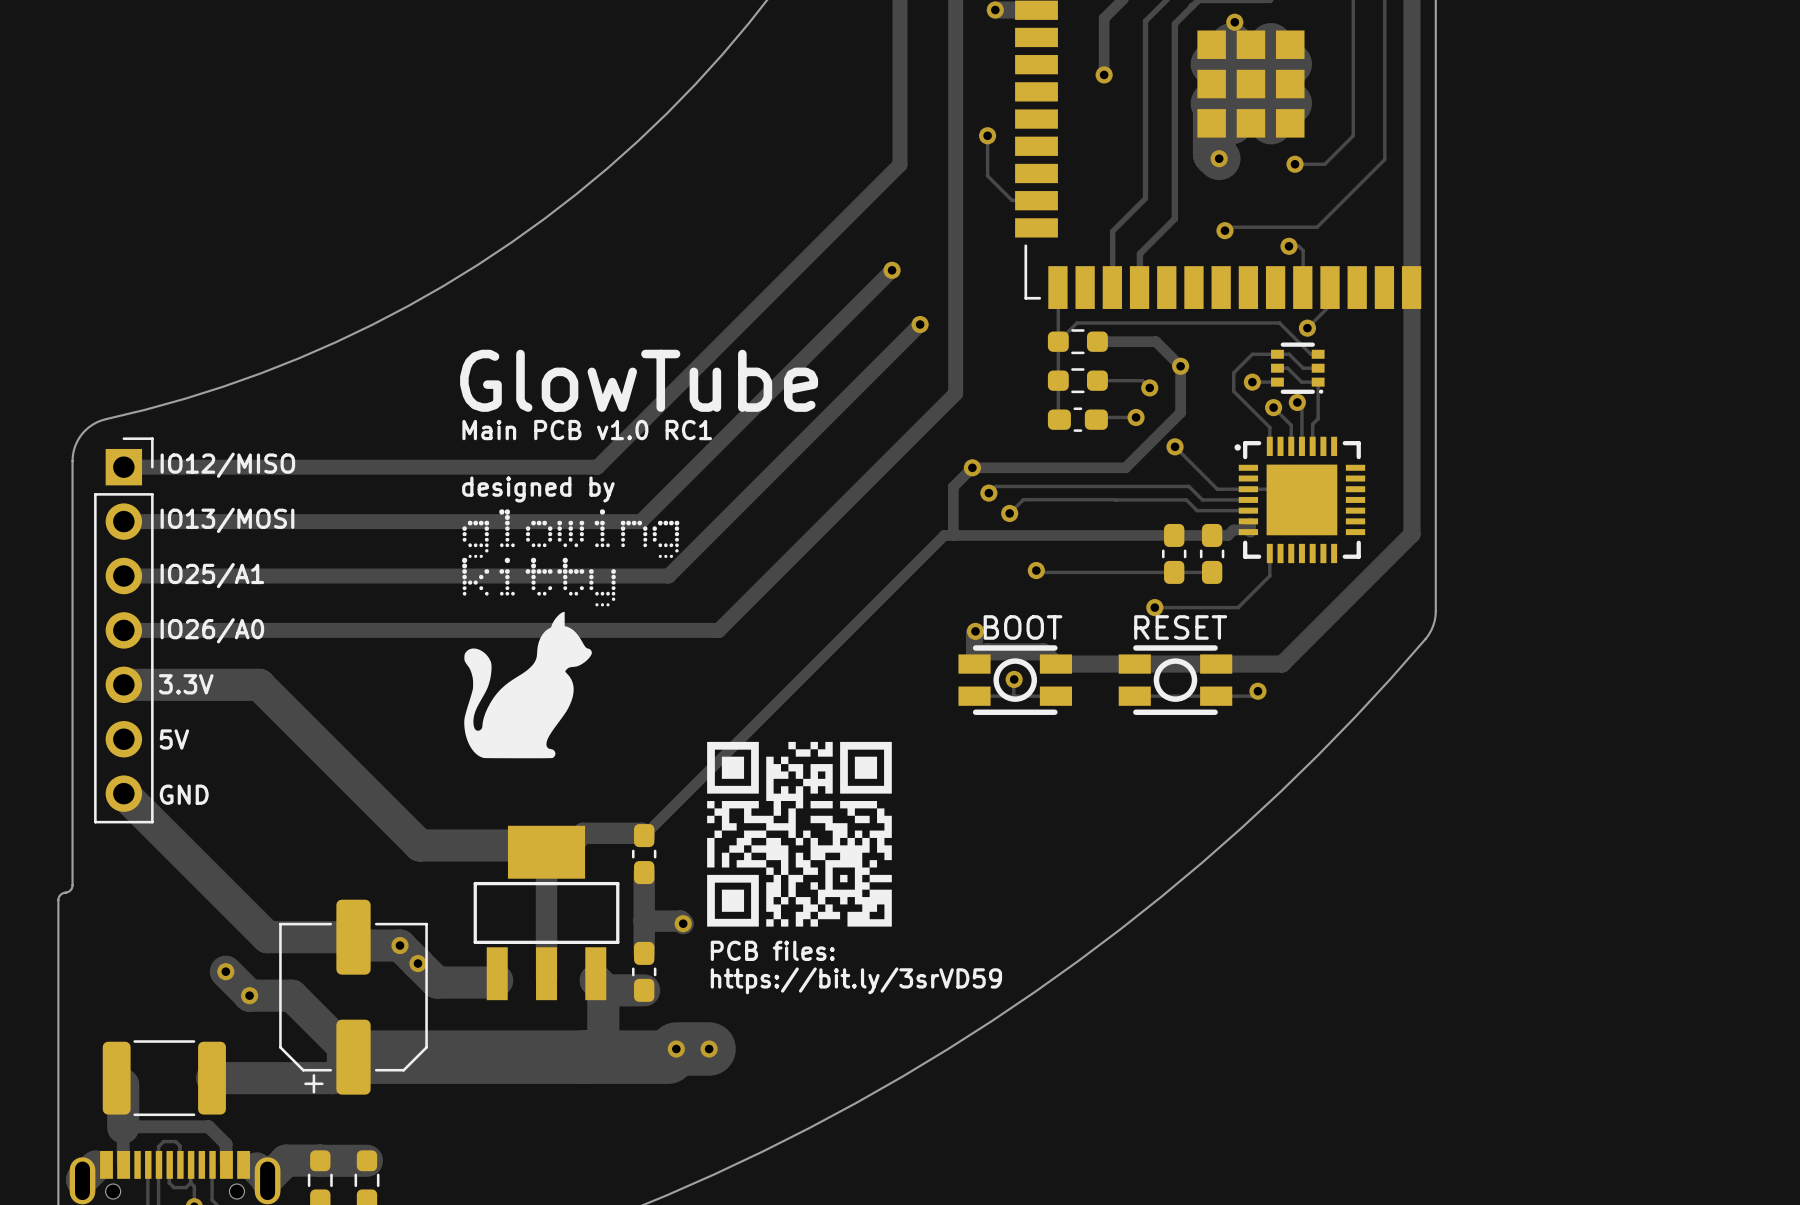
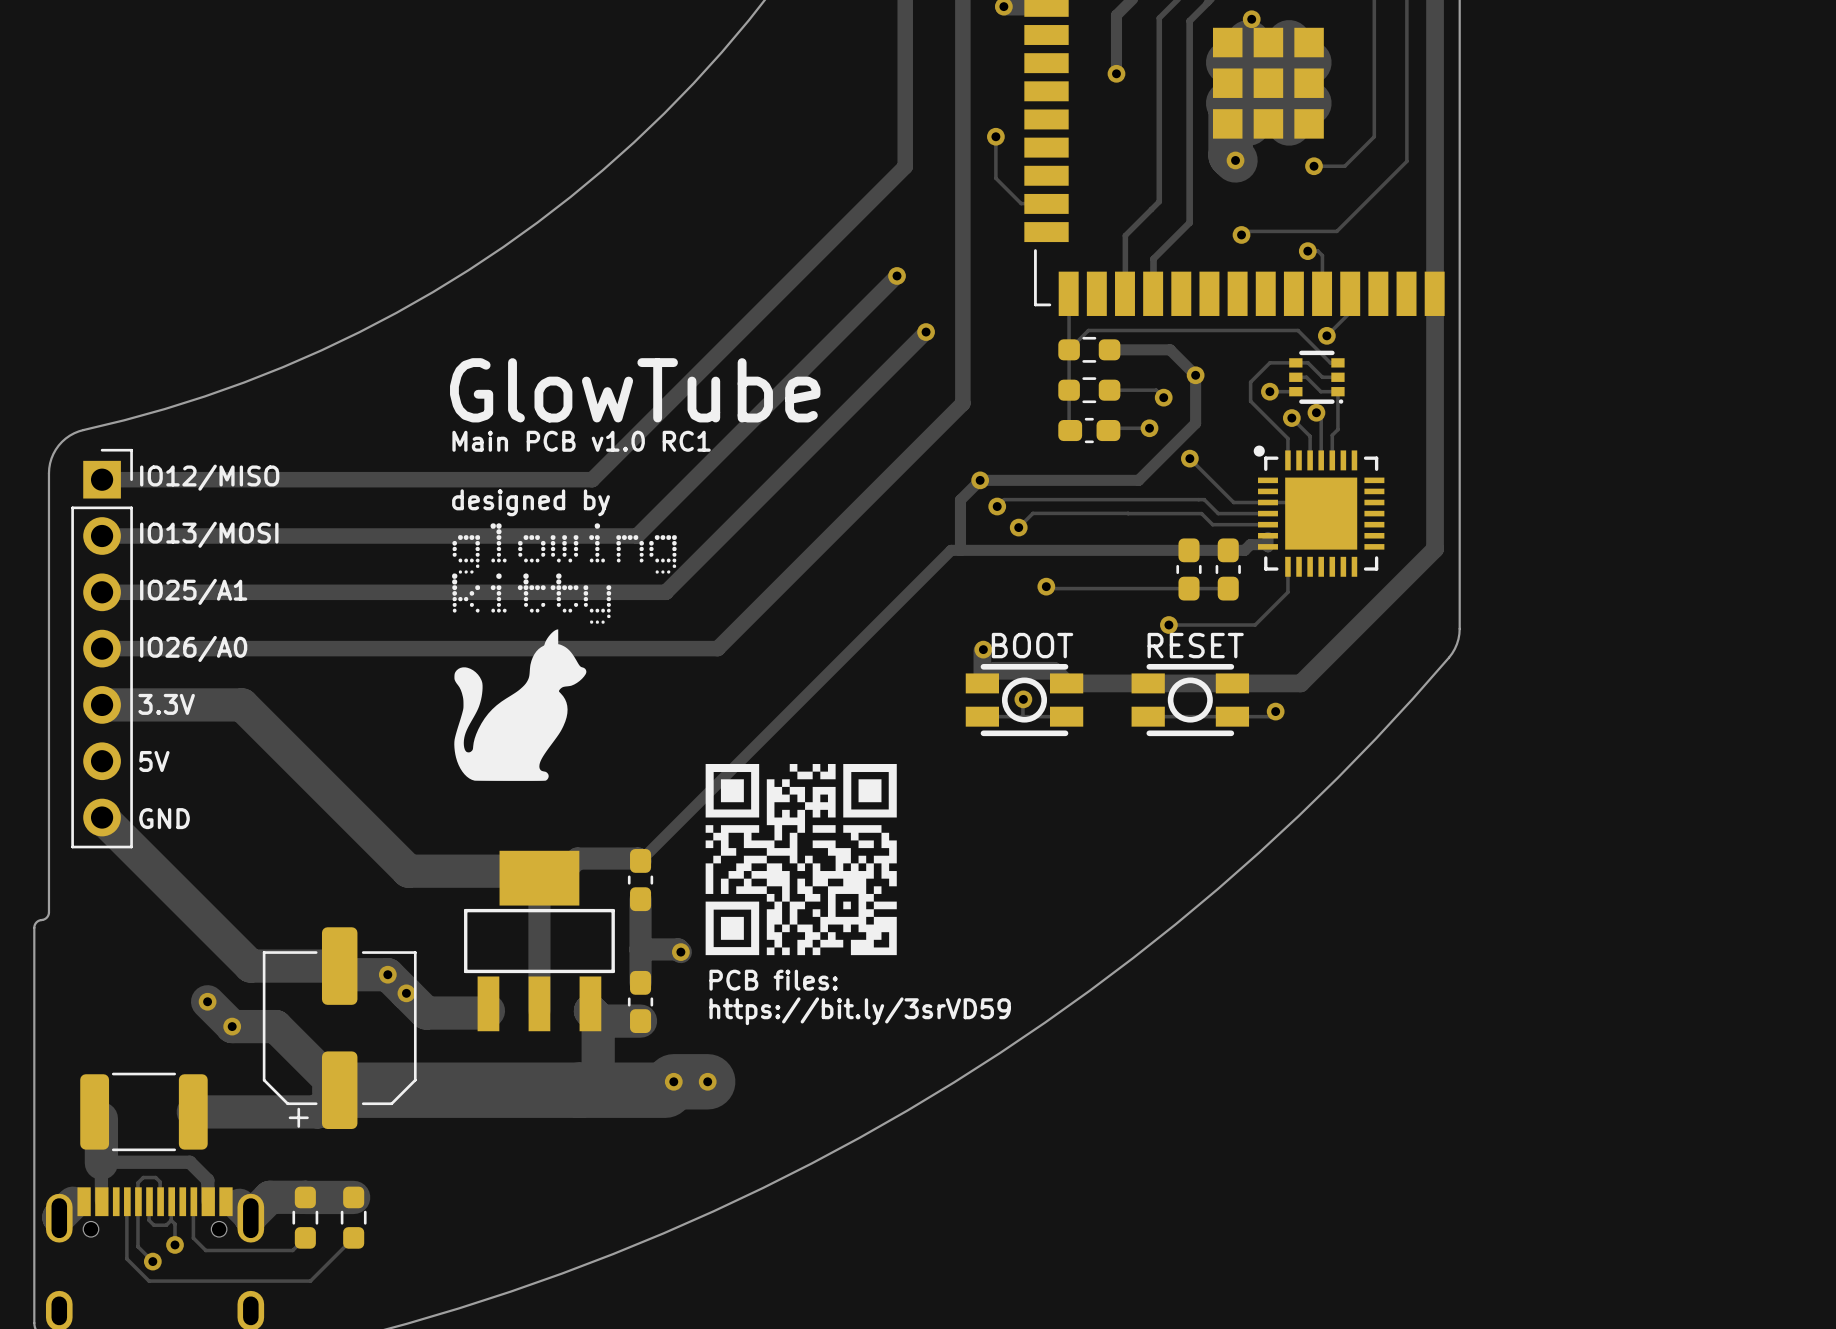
part footprint: [1234, 436, 1366, 564] -> [1253, 445, 1385, 577]

